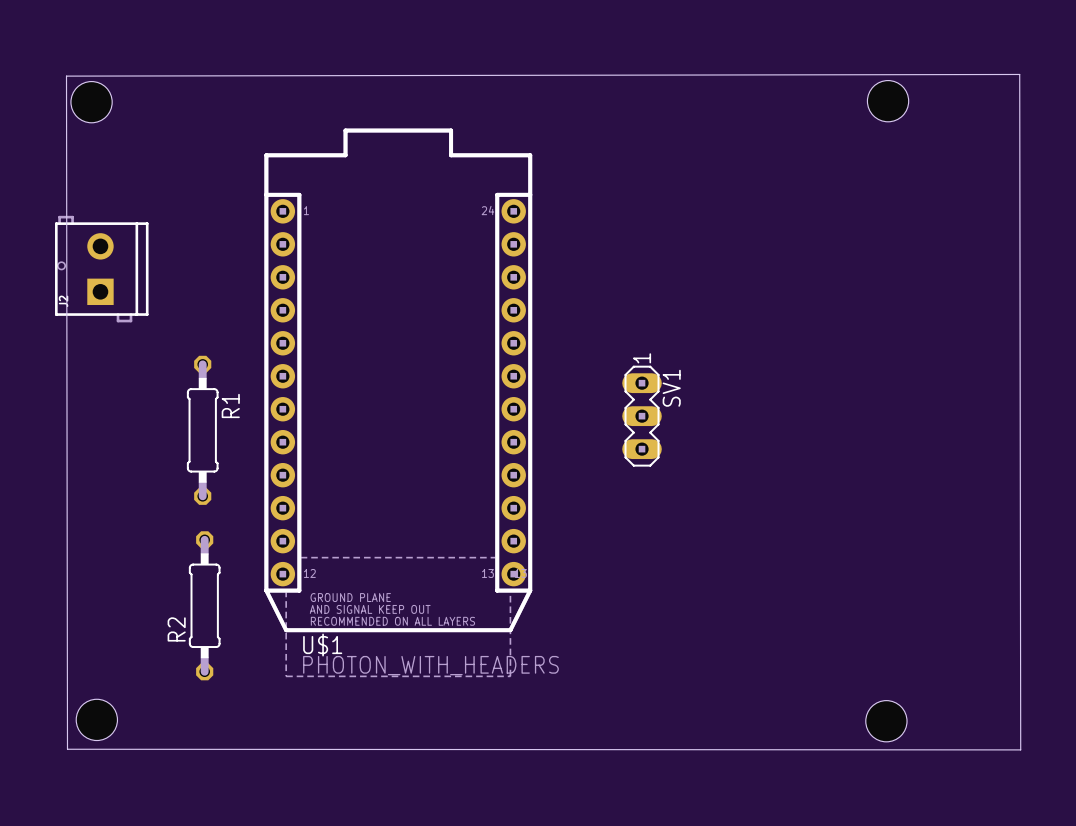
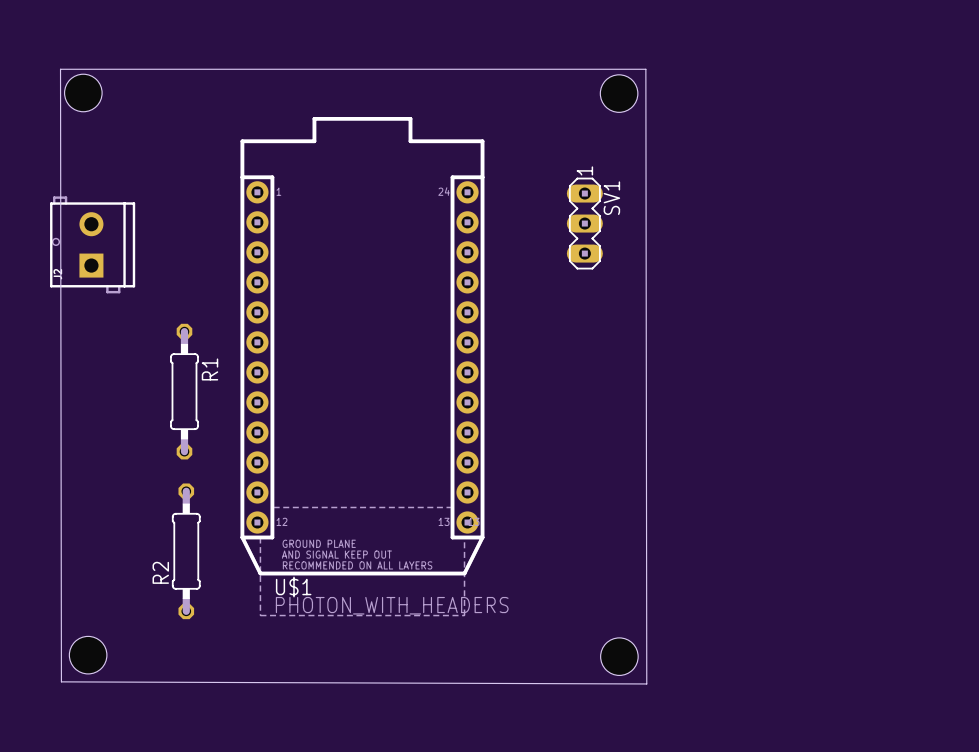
board edge: (66, 76) (1019, 74) (1020, 749) (67, 749) -> (60, 69) (645, 69) (646, 683) (61, 681)
hole position: (888, 101) -> (619, 93)
SV1 position: (642, 416) -> (584, 223)
hole position: (886, 721) -> (619, 656)

